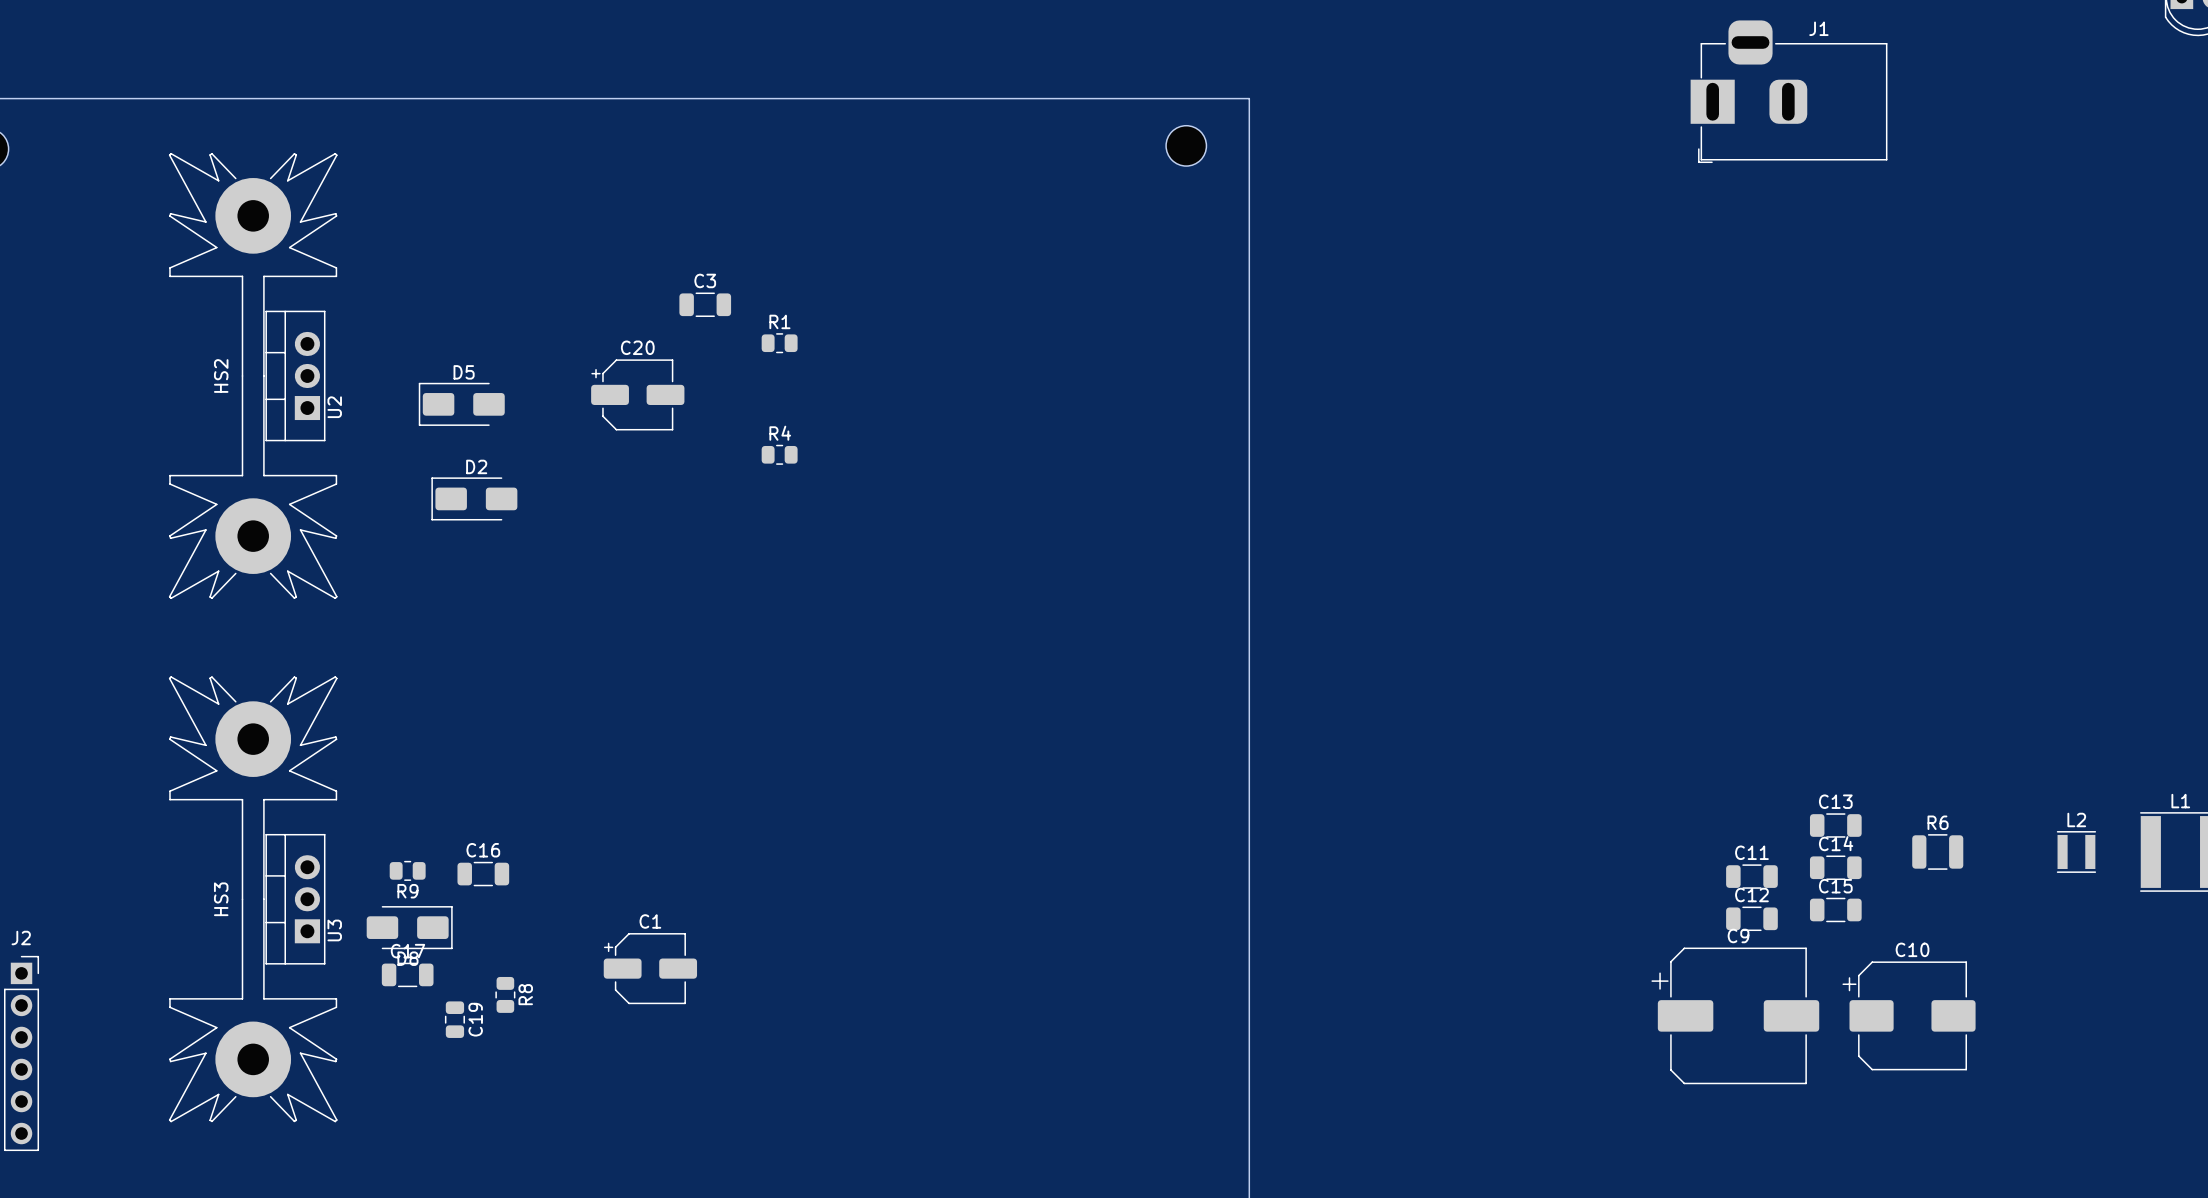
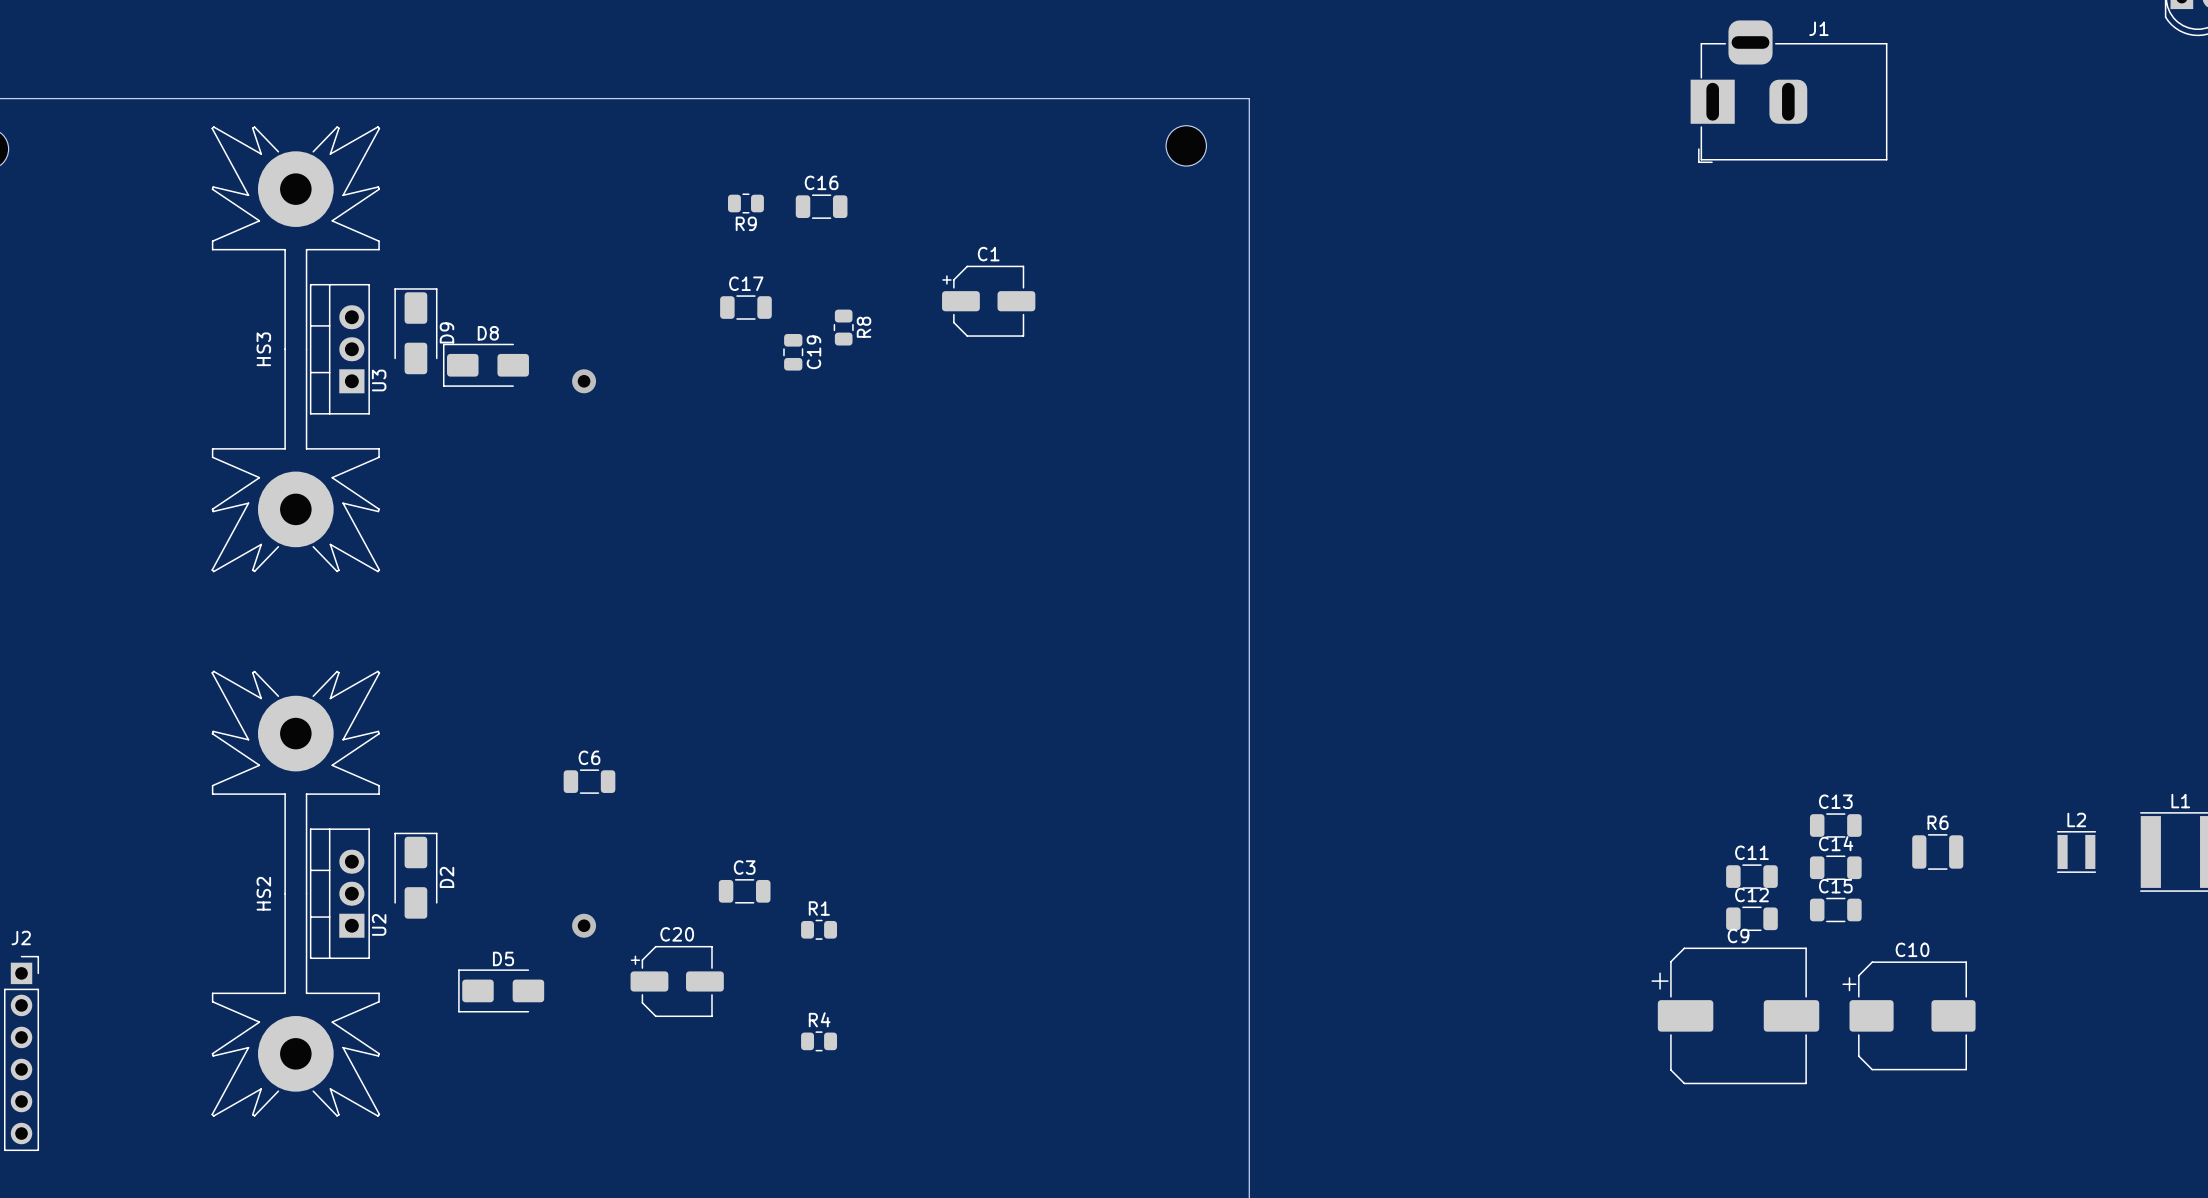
C3 position: (705, 304) -> (744, 891)
D9: none -> (415, 331)
R1 position: (779, 343) -> (819, 929)
HS2 position: (253, 375) -> (295, 893)
U2 position: (295, 375) -> (339, 893)
via: none -> (584, 381)
C20 position: (637, 394) -> (677, 981)
D5 position: (461, 404) -> (501, 990)
R4 position: (779, 454) -> (819, 1041)
D2 rotation: 0° (474, 498) -> 90° clockwise (415, 875)
D2 position: (474, 498) -> (415, 875)
C6: none -> (589, 781)
R9 position: (407, 870) -> (745, 203)
C16 position: (483, 874) -> (821, 206)
HS3 position: (253, 899) -> (295, 349)
U3 position: (295, 899) -> (339, 349)
via: none -> (584, 925)
D8 rotation: 0° (409, 927) -> 180° (485, 365)
D8 position: (409, 927) -> (485, 365)
C1 position: (650, 968) -> (988, 301)
C17 position: (407, 974) -> (745, 307)
R8 position: (505, 994) -> (843, 327)
C19 position: (454, 1019) -> (793, 352)

